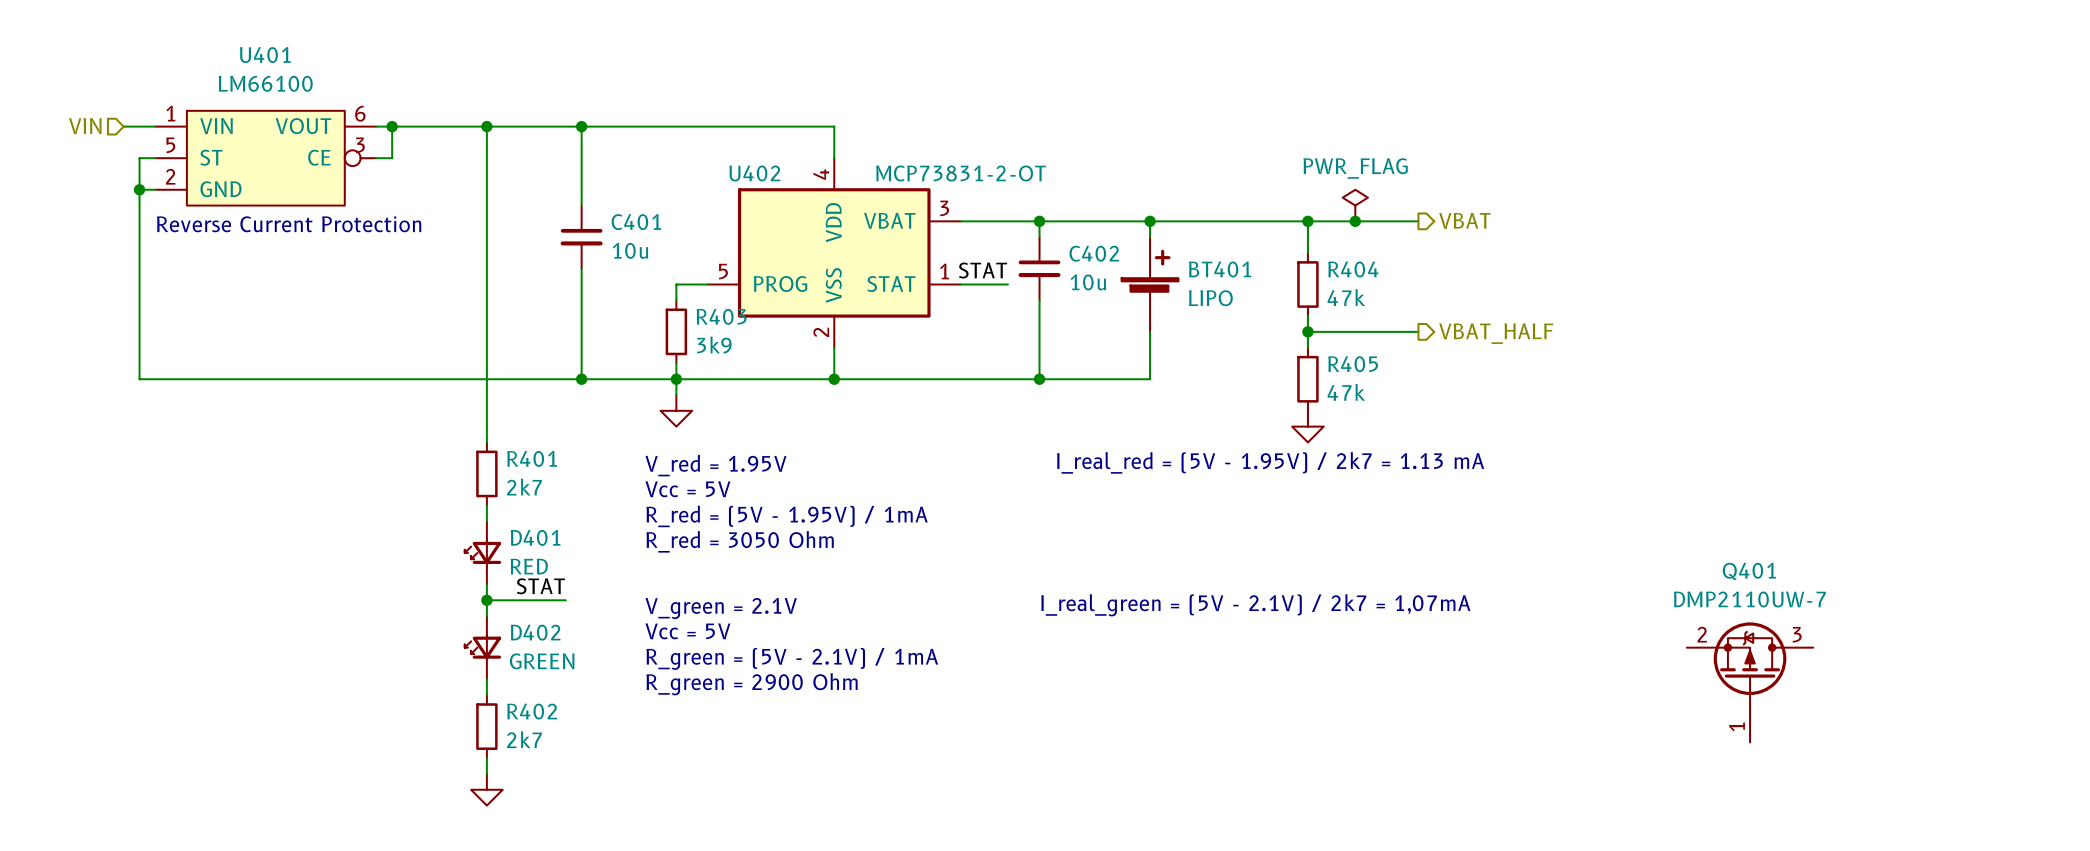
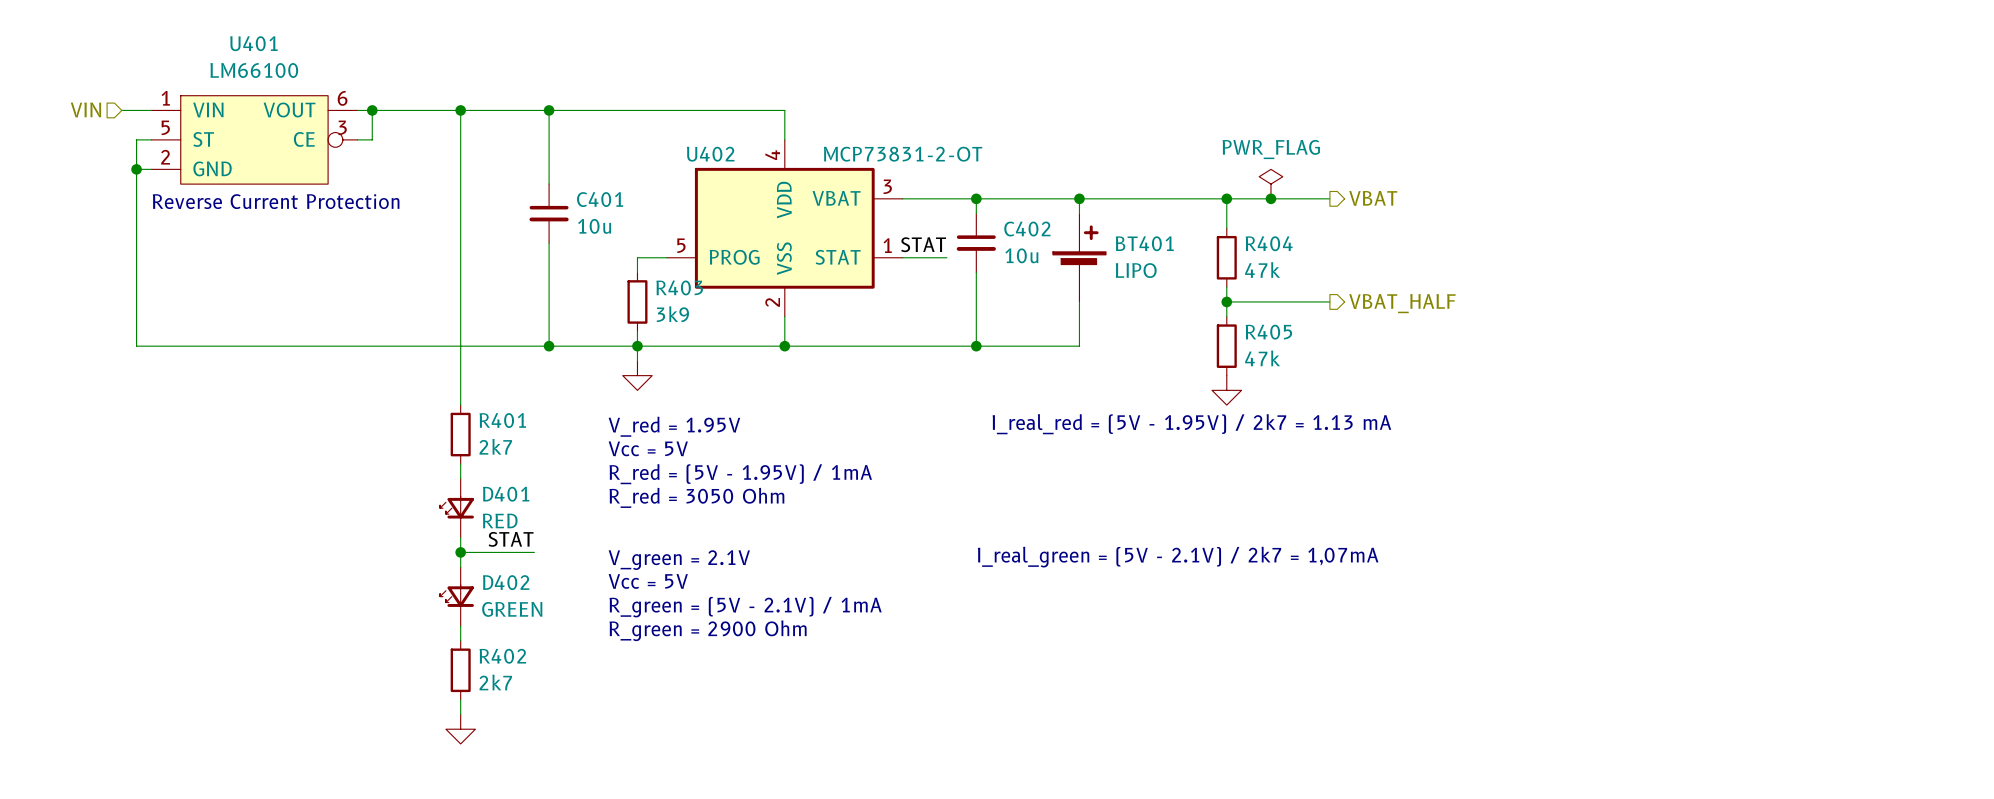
Q401: DMP2110UW-7 (1750, 682) -> none

